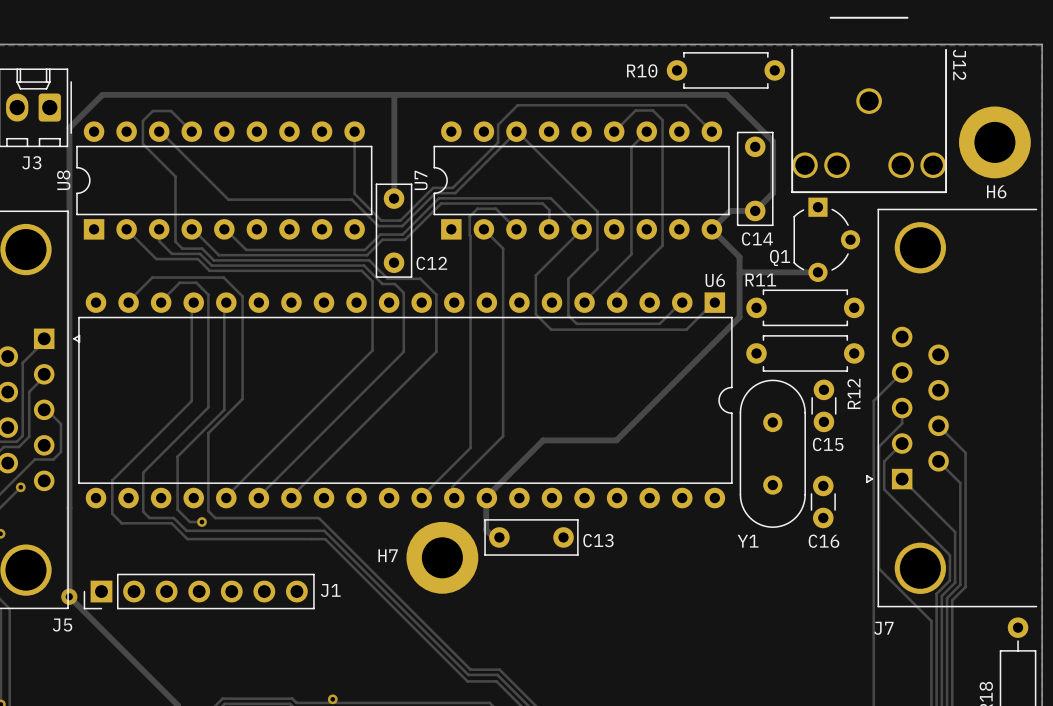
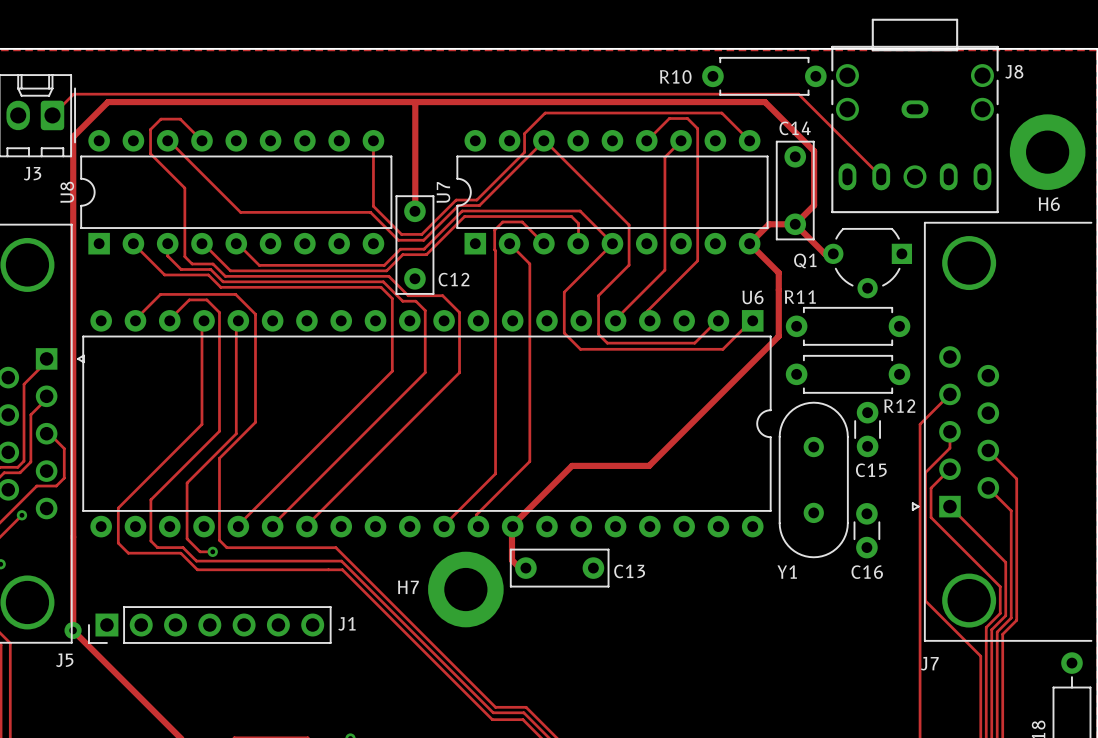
J12: (875, 104) -> none
track: none -> (52, 115) (73, 94) (798, 94) (881, 176)
J8: none -> (914, 115)
track: none -> (795, 224) (824, 253) (833, 253)
C14 name position: C14 (757, 238) -> C14 (795, 128)
Q1 rotation: 0° (826, 239) -> 90° clockwise (867, 263)
track: (817, 272) (739, 273) -> none
R12 name rotation: 0° (853, 393) -> 90° clockwise (899, 406)

